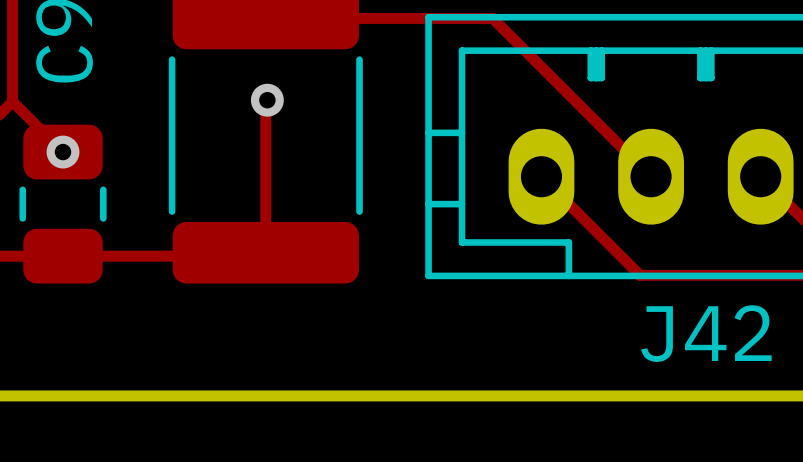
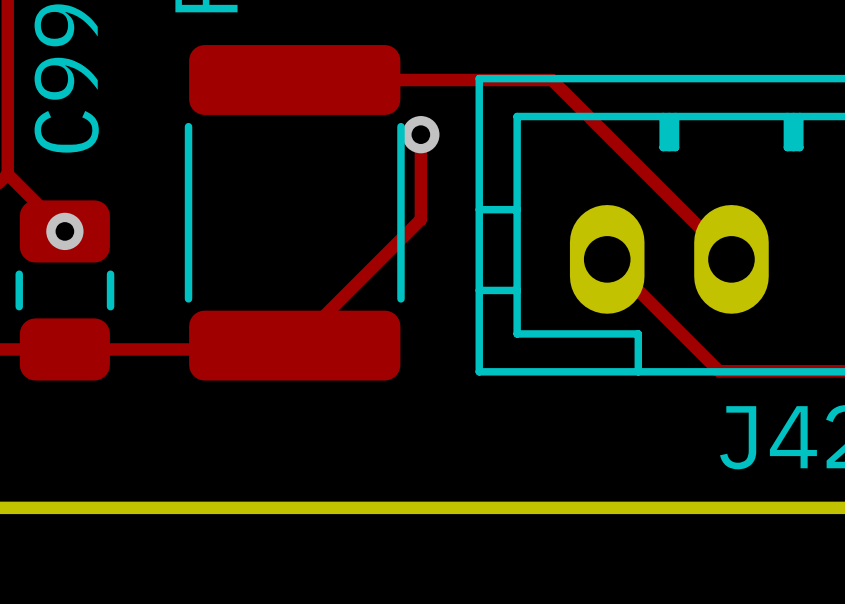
track: (267, 100) (265, 101) (265, 252) -> (420, 134) (420, 219) (294, 345)
via position: (267, 100) -> (420, 134)

